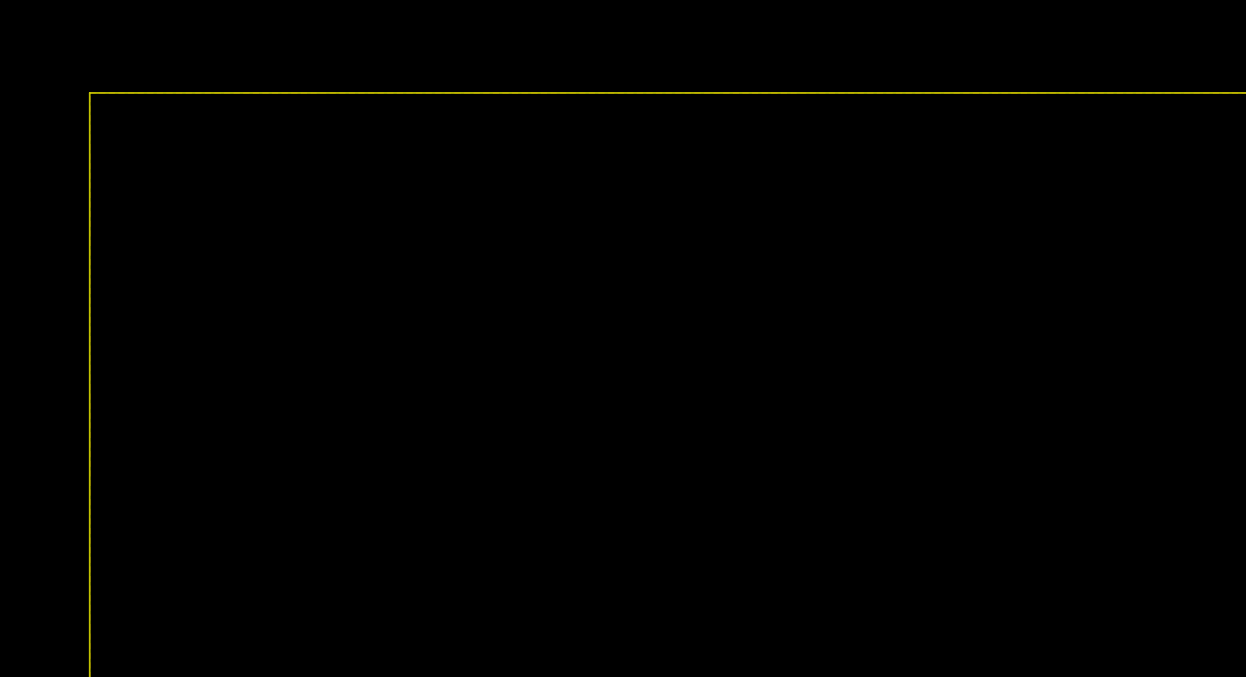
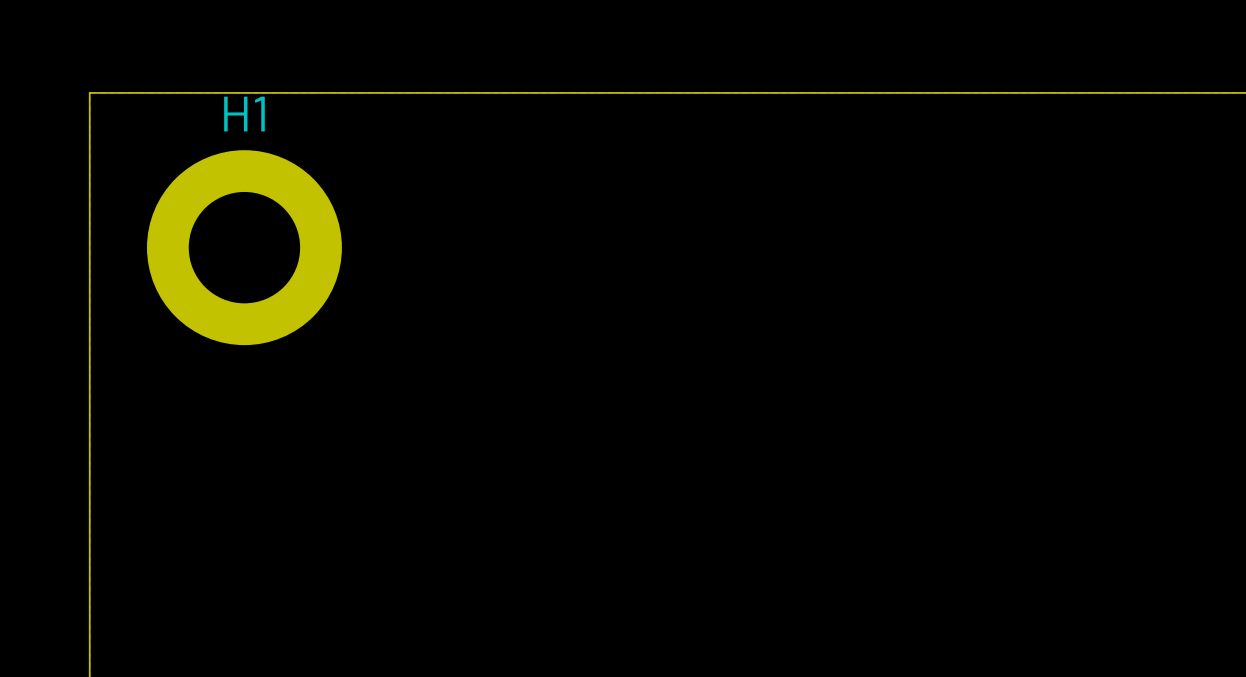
H1: none -> (244, 247)

